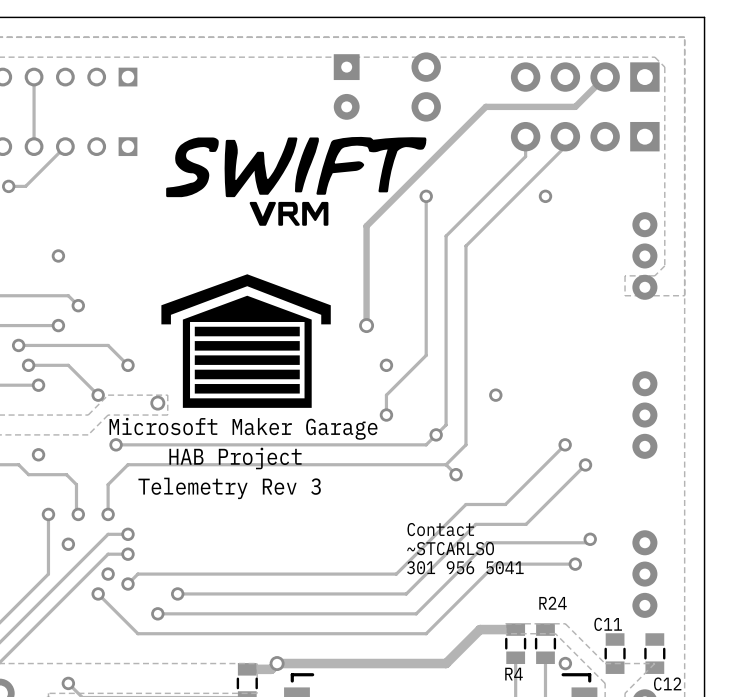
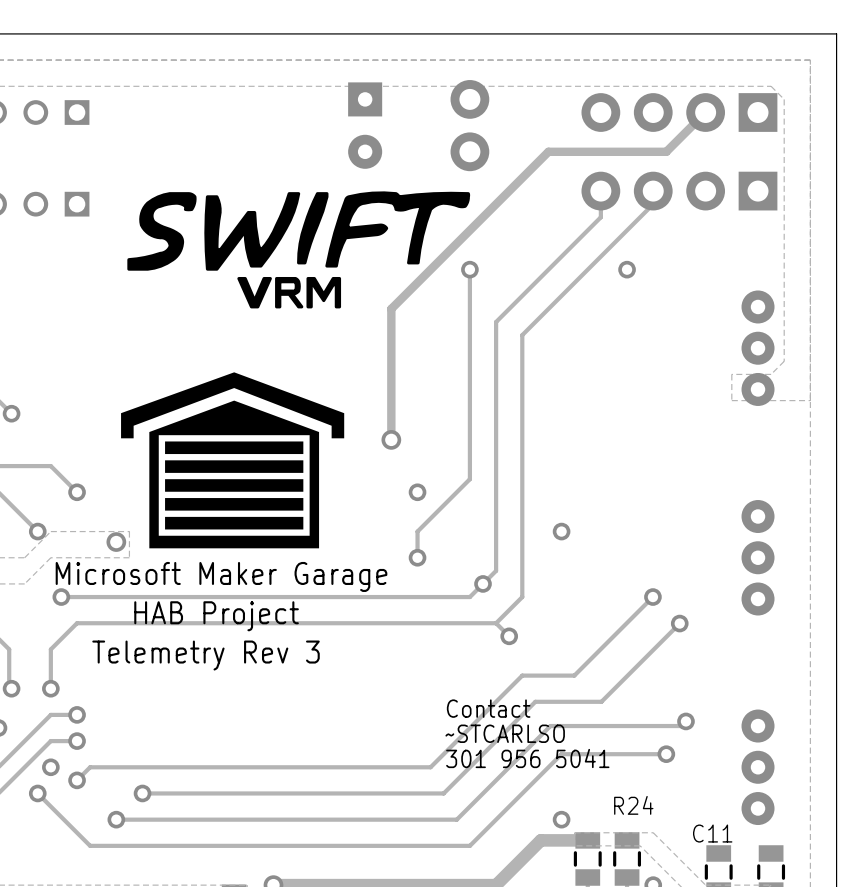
via: none -> (561, 819)

